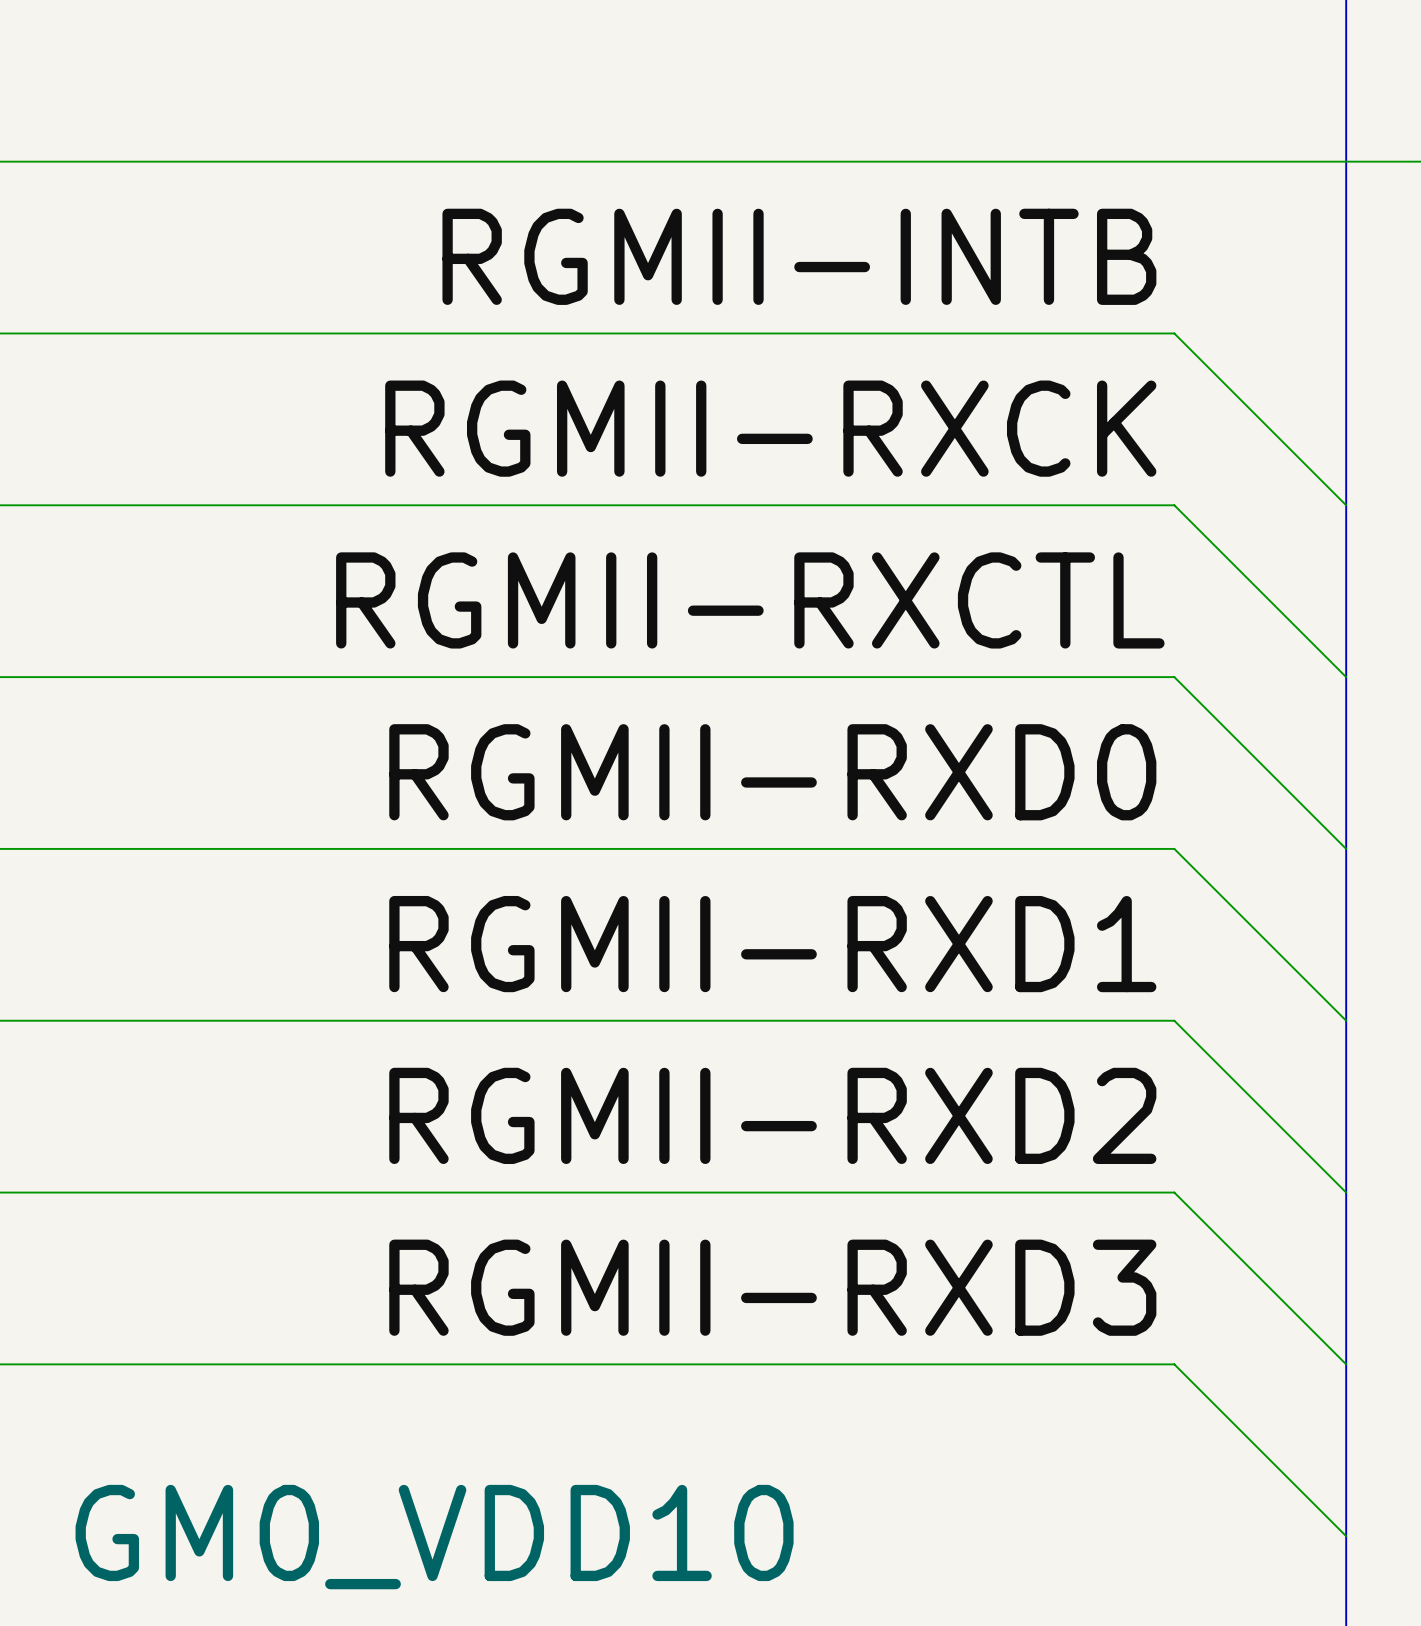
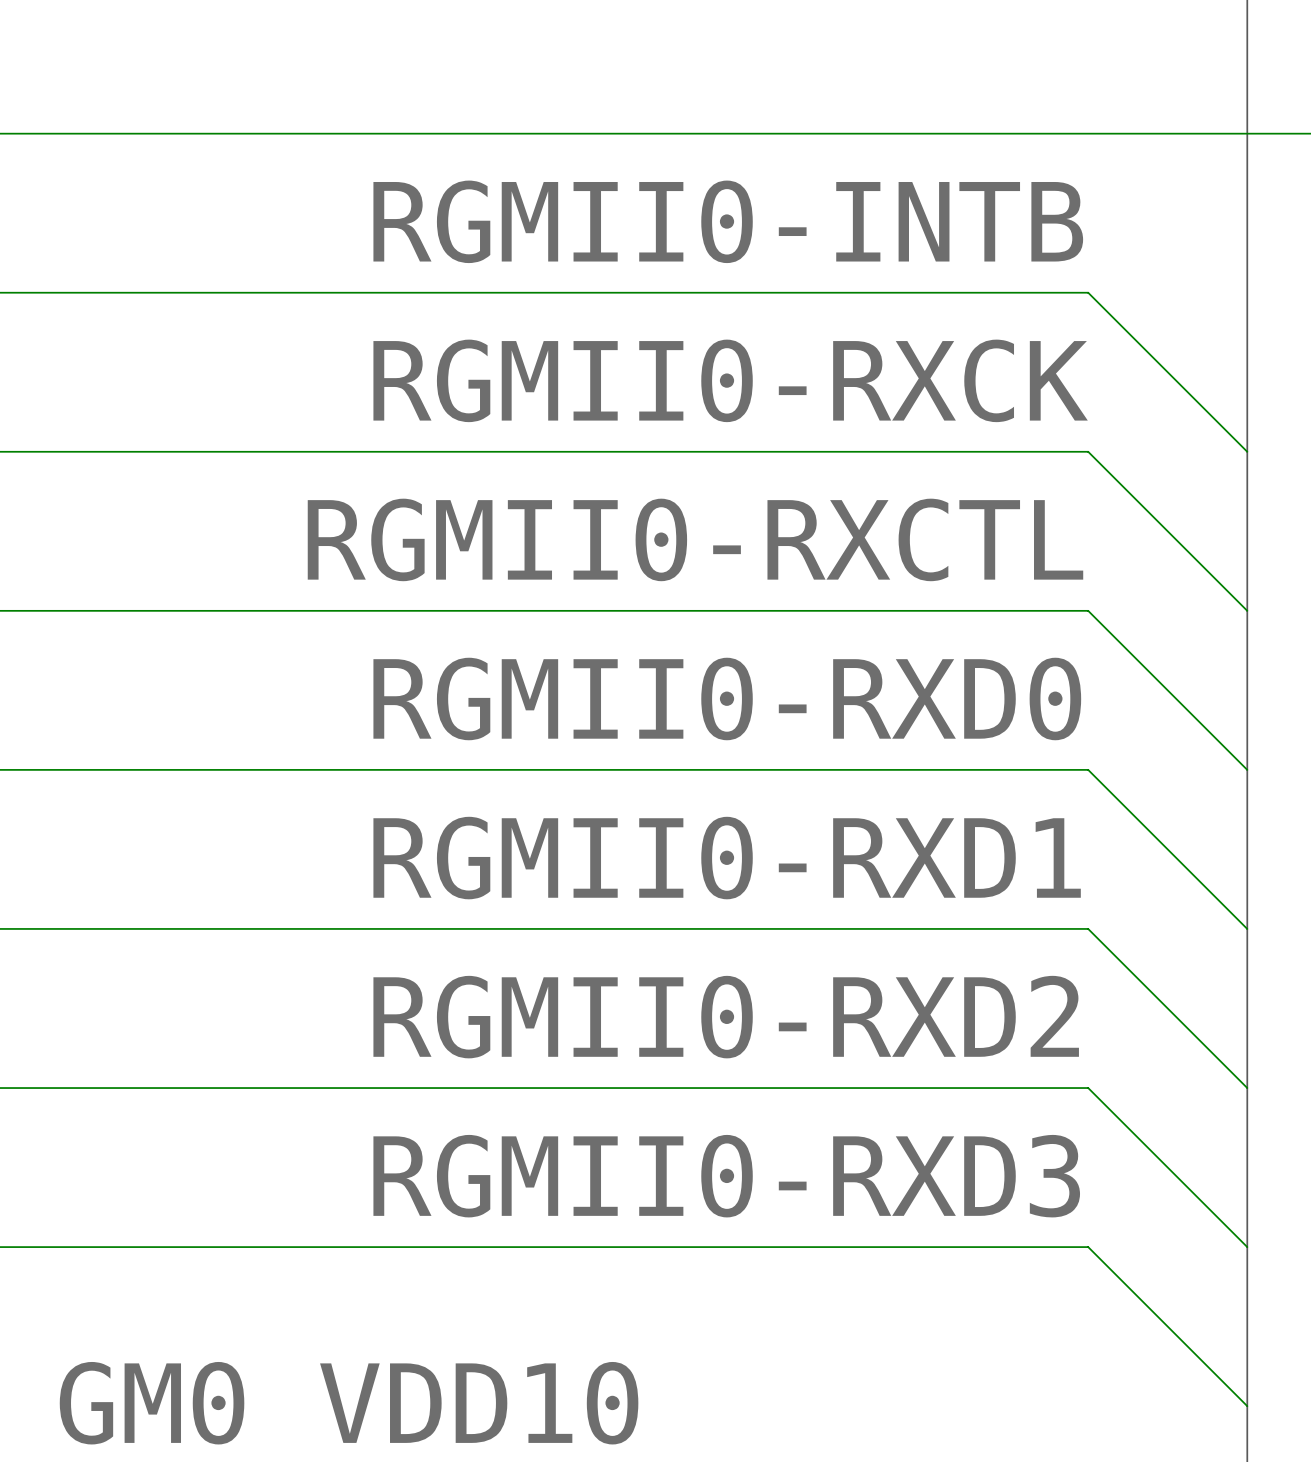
label: RGMII-INTB (799, 256) -> RGMII0-INTB (728, 221)
label: RGMII-RXCK (770, 428) -> RGMII0-RXCK (730, 380)
label: RGMII-RXCTL (750, 600) -> RGMII0-RXCTL (695, 539)
label: RGMII-RXD0 (772, 772) -> RGMII0-RXD0 (727, 698)
label: RGMII-RXD1 (772, 944) -> RGMII0-RXD1 (727, 858)
label: RGMII-RXD2 (772, 1115) -> RGMII0-RXD2 (726, 1017)
label: RGMII-RXD3 (772, 1287) -> RGMII0-RXD3 (726, 1176)

